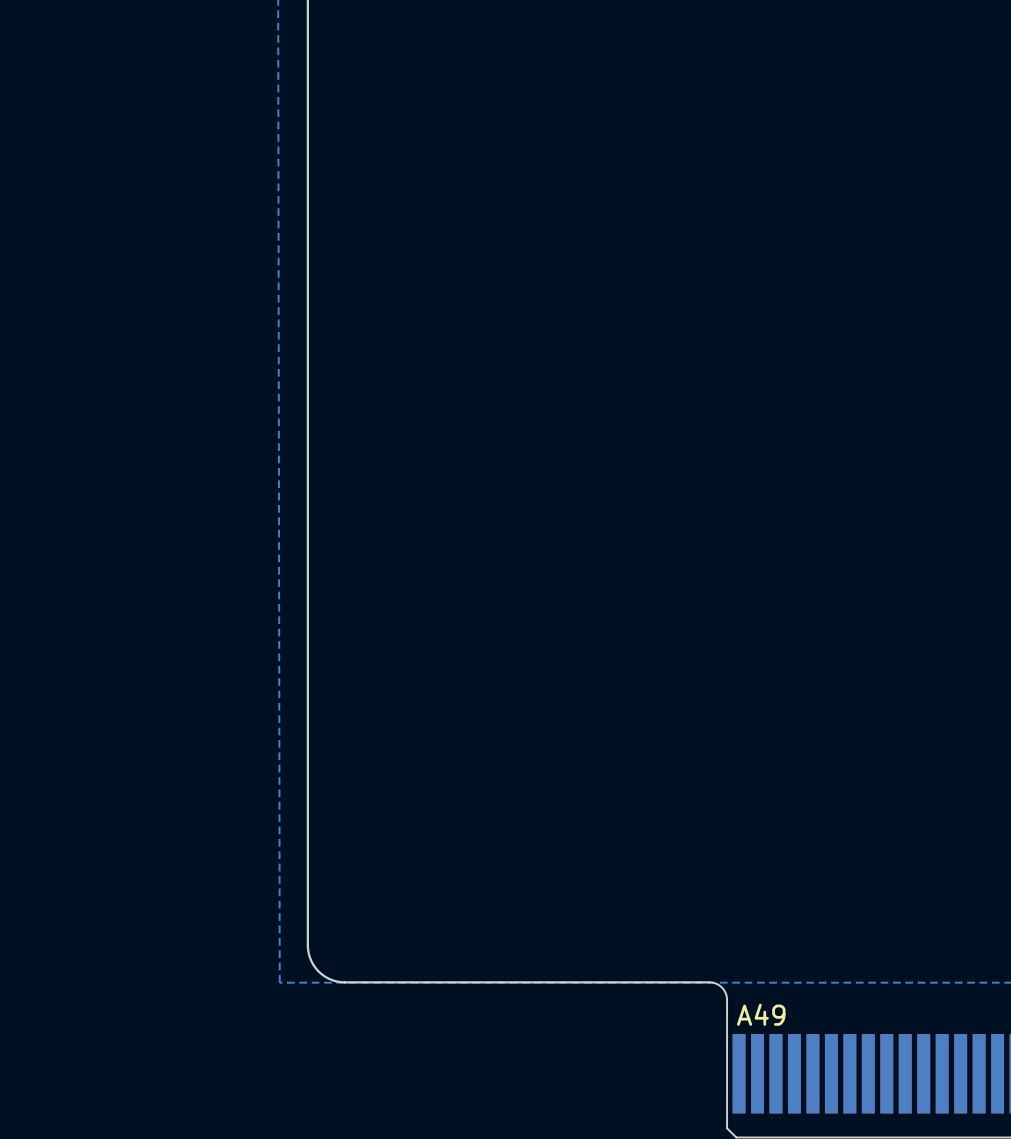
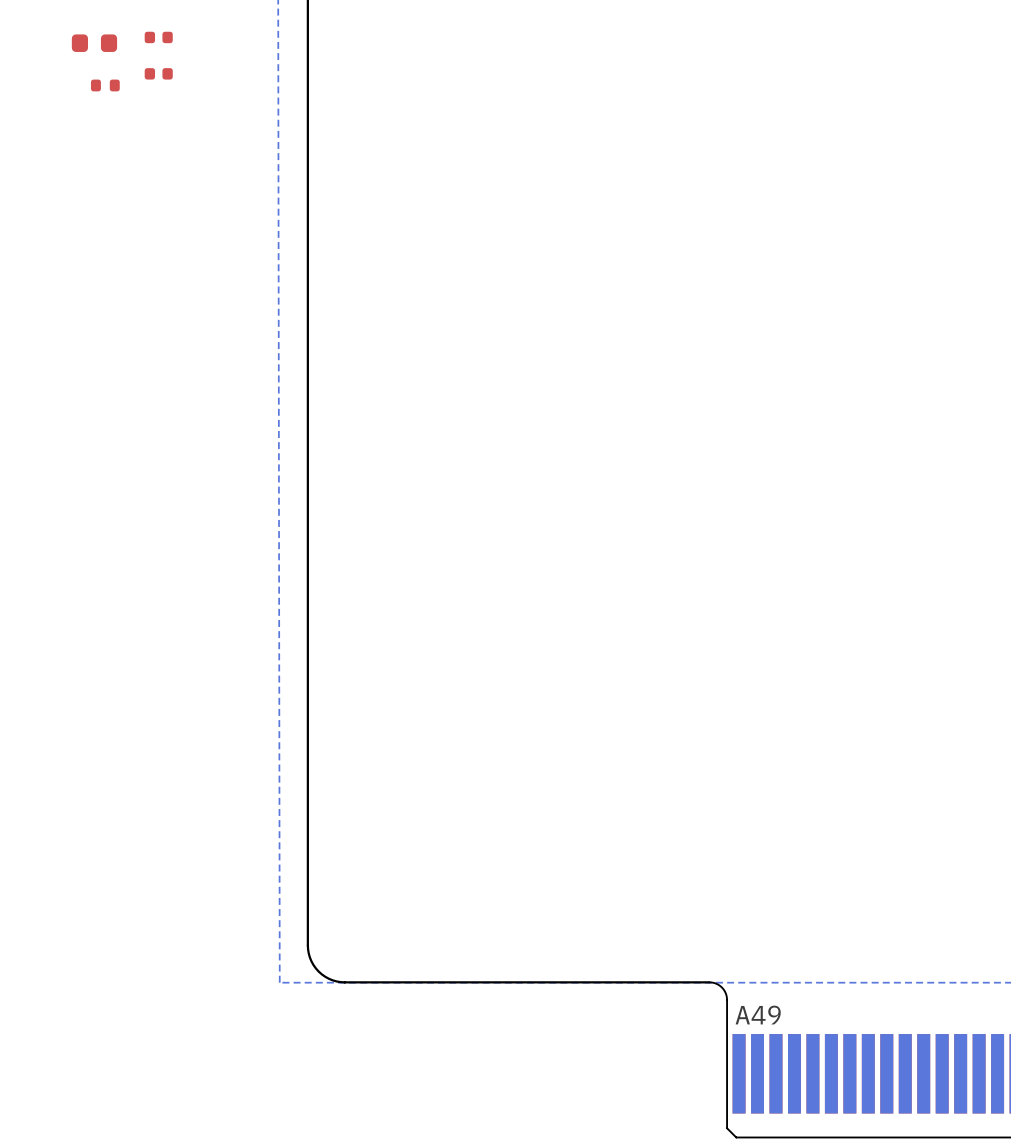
part: none -> (158, 37)
part: none -> (94, 43)
part: none -> (158, 73)
part: none -> (105, 85)

